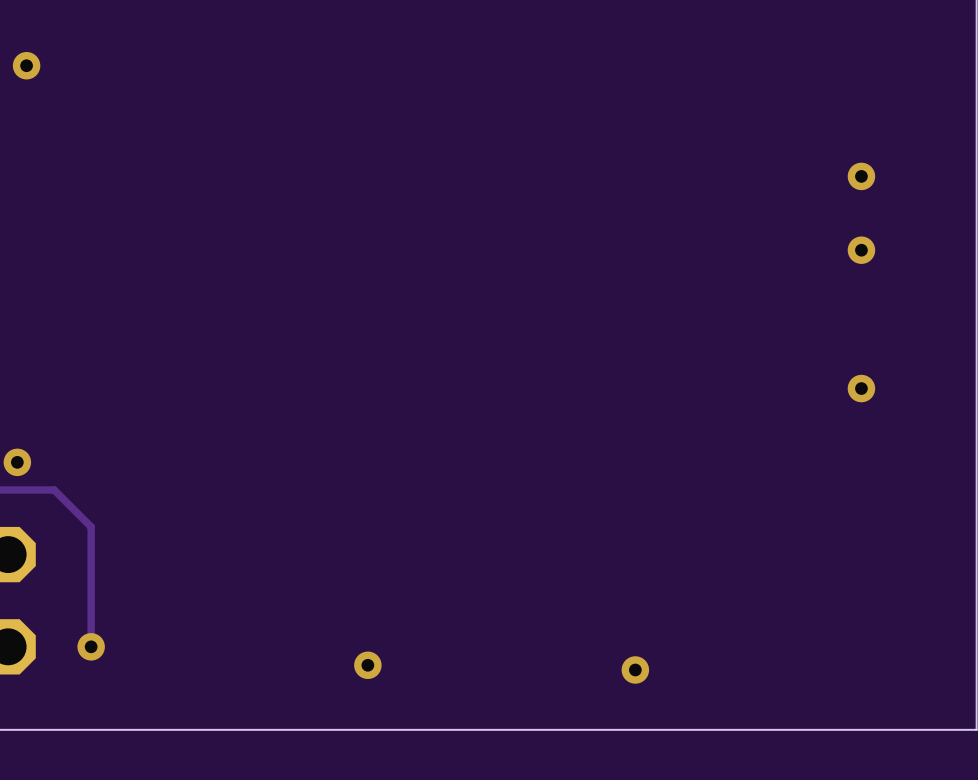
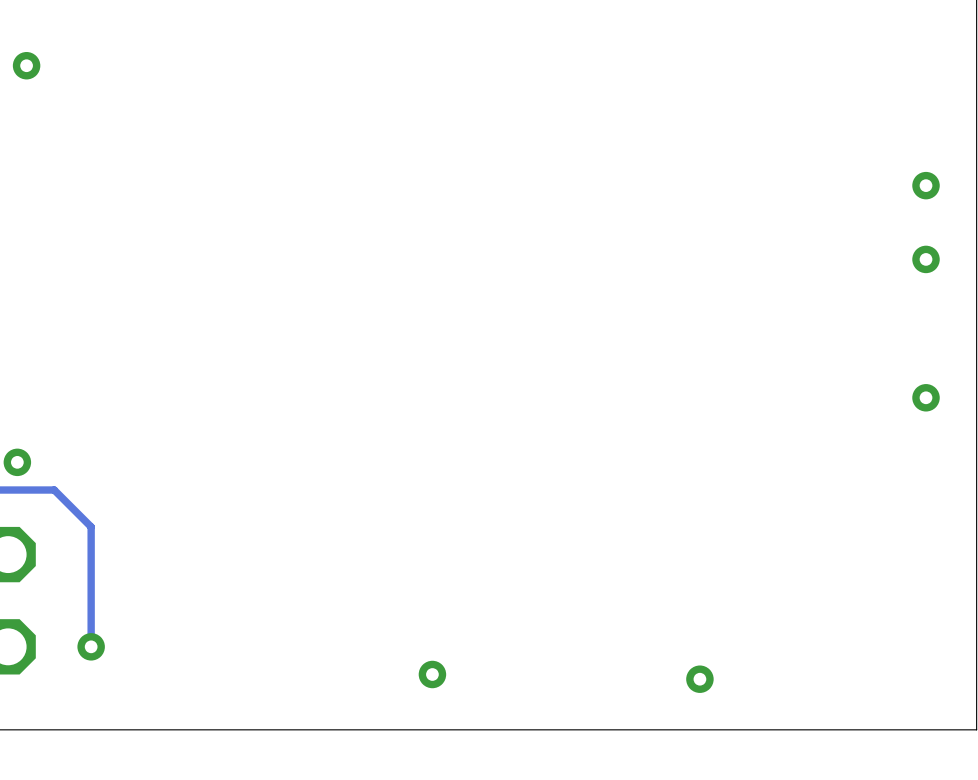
via: (861, 176) -> none
via: none -> (926, 185)
via: (861, 250) -> none
via: none -> (926, 259)
via position: (861, 388) -> (926, 397)
via position: (367, 665) -> (432, 674)
via position: (635, 669) -> (699, 679)

